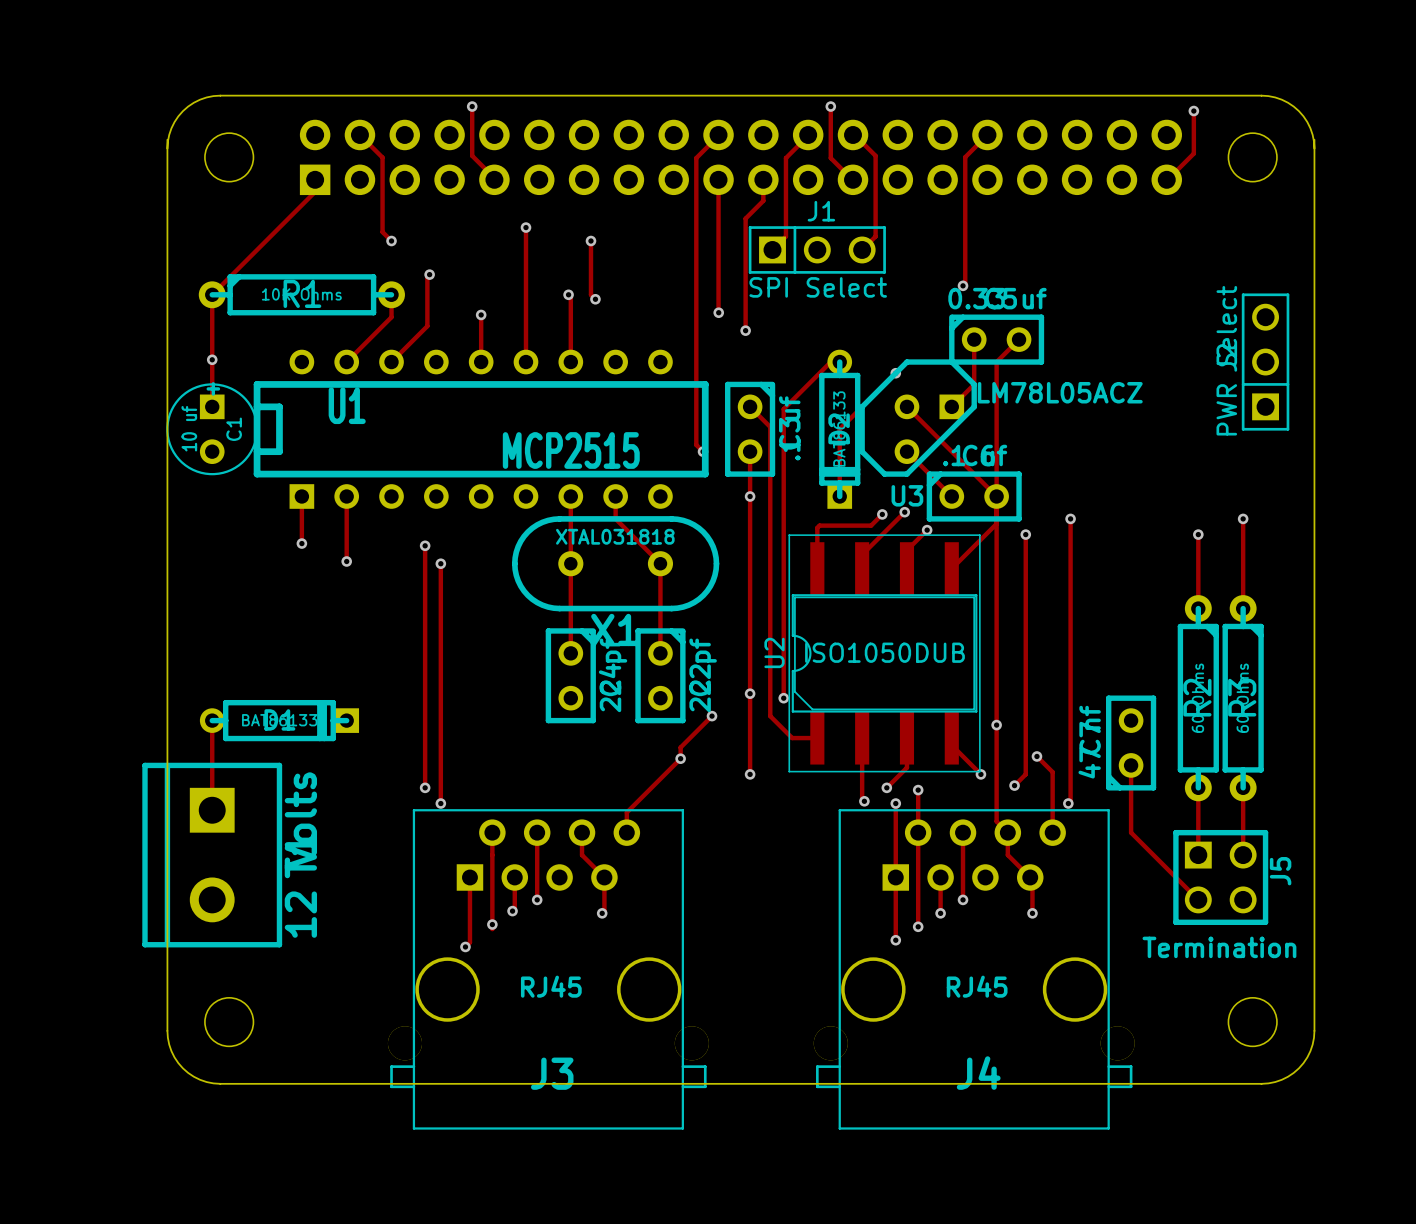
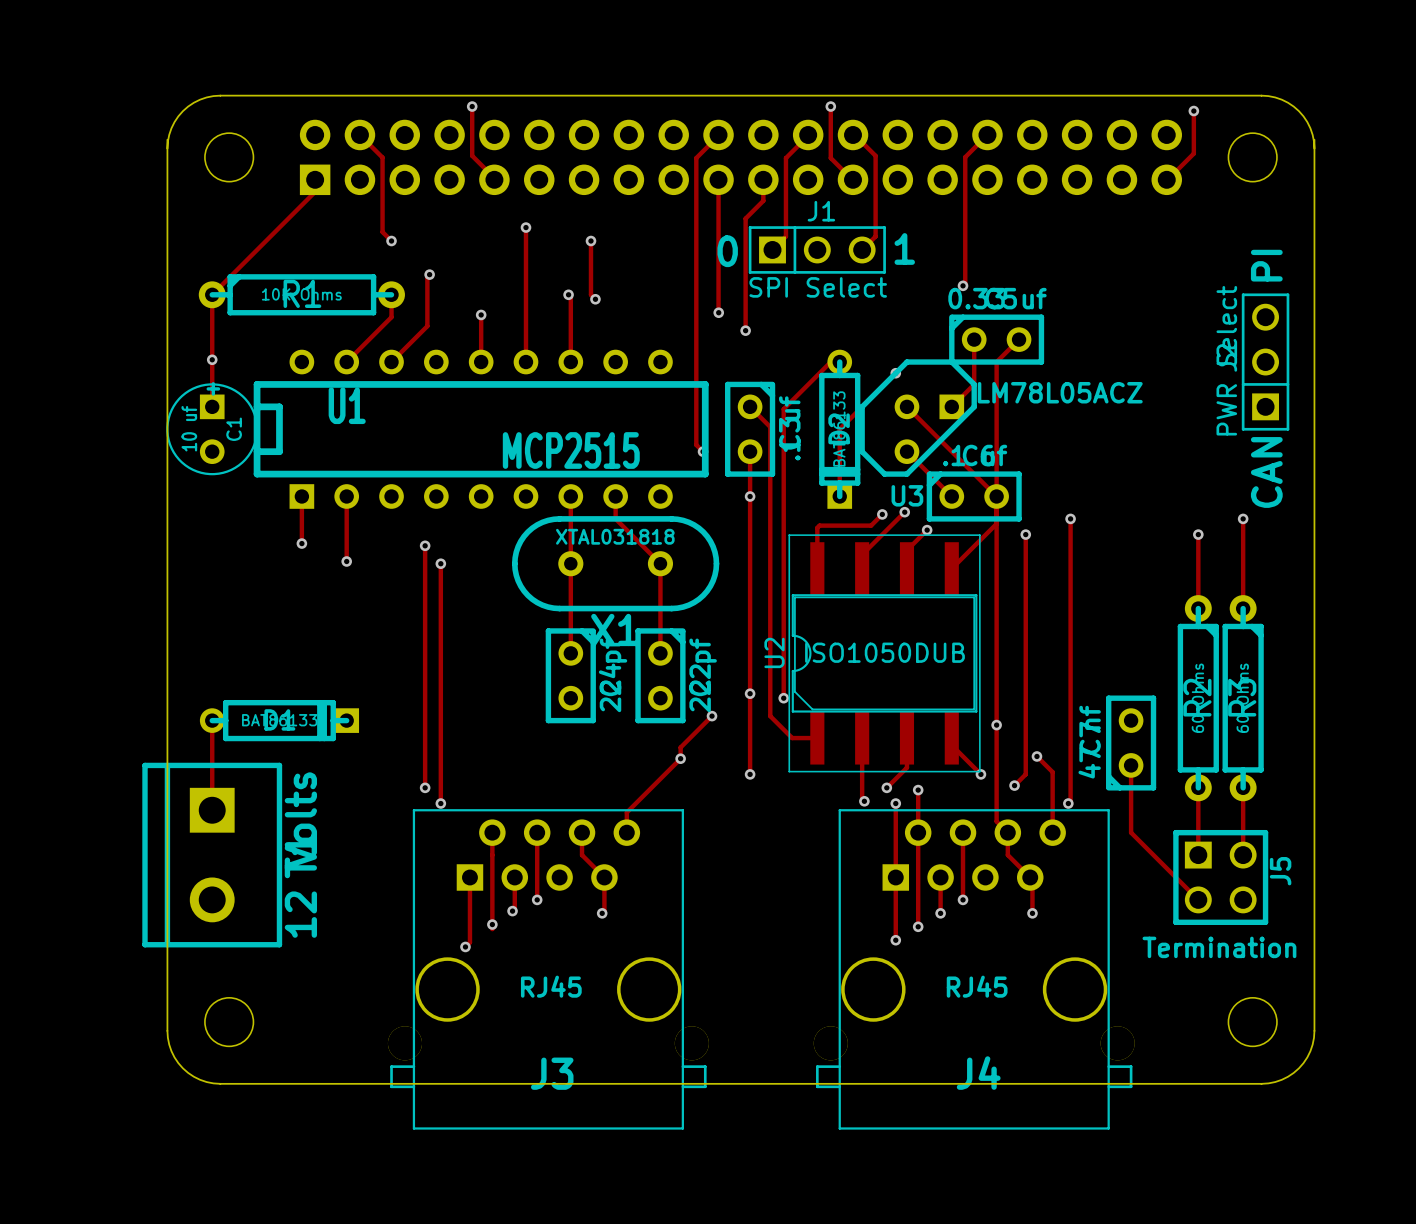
text: none -> 1 (904, 248)
text: none -> 0 (727, 251)
text: none -> PI (1266, 265)
text: none -> CAN (1266, 472)

